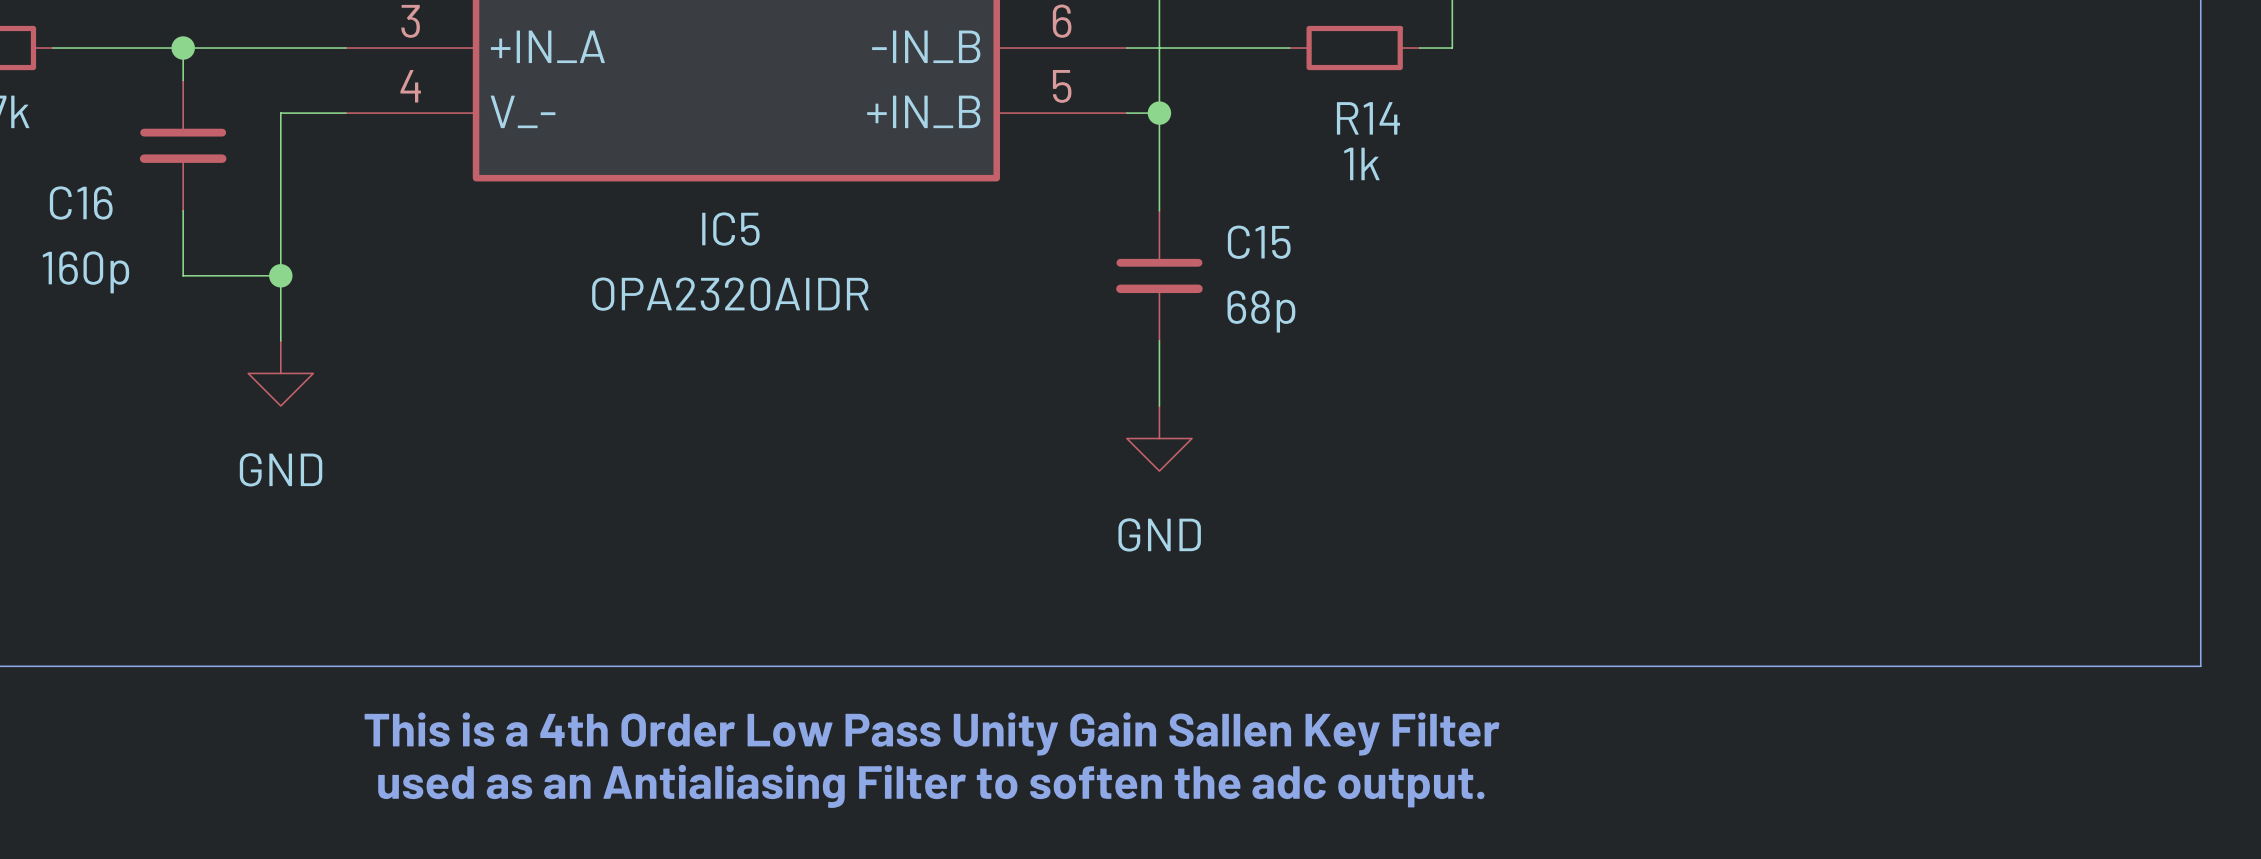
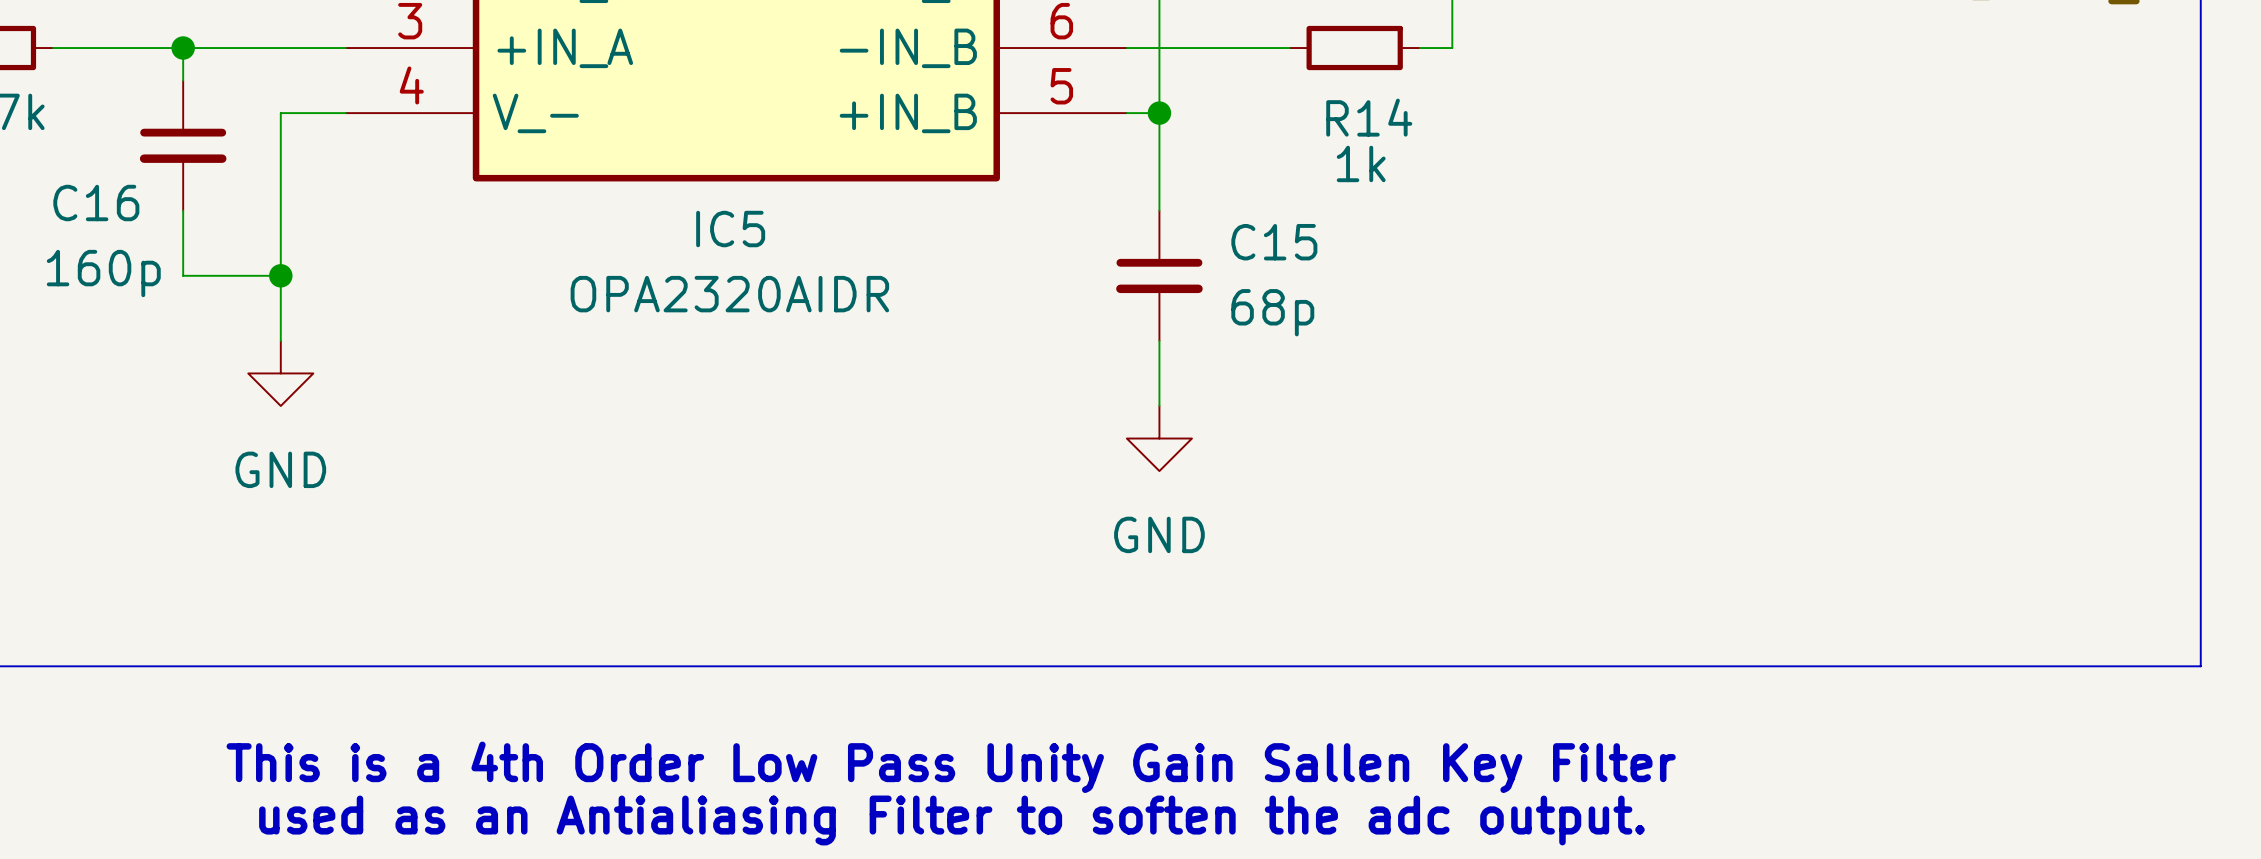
text position: This is a 4th Order Low Pass Unity Gain Sallen Key Filter (932, 734) -> This is a 4th Order Low Pass Unity Gain Sallen Key Filter (951, 767)
text position: used as an Antialiasing Filter to soften the adc output. (931, 786) -> used as an Antialiasing Filter to soften the adc output. (951, 820)

